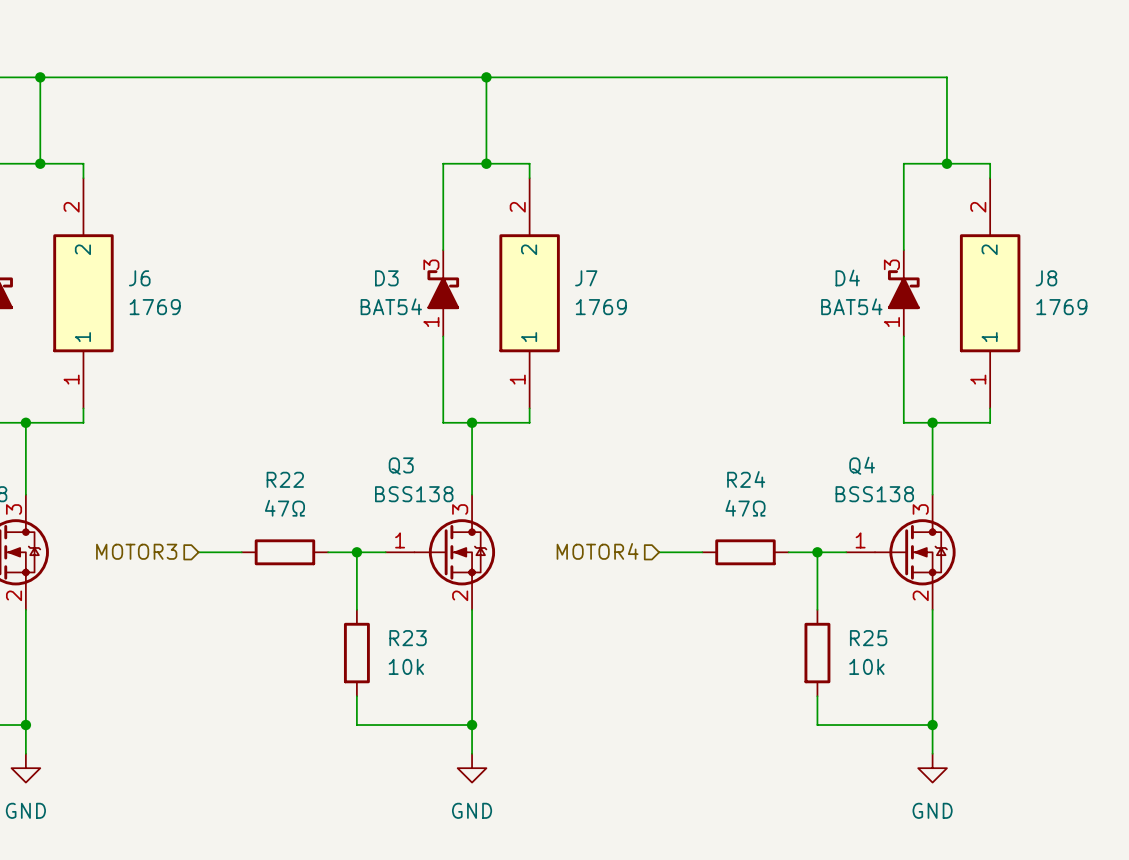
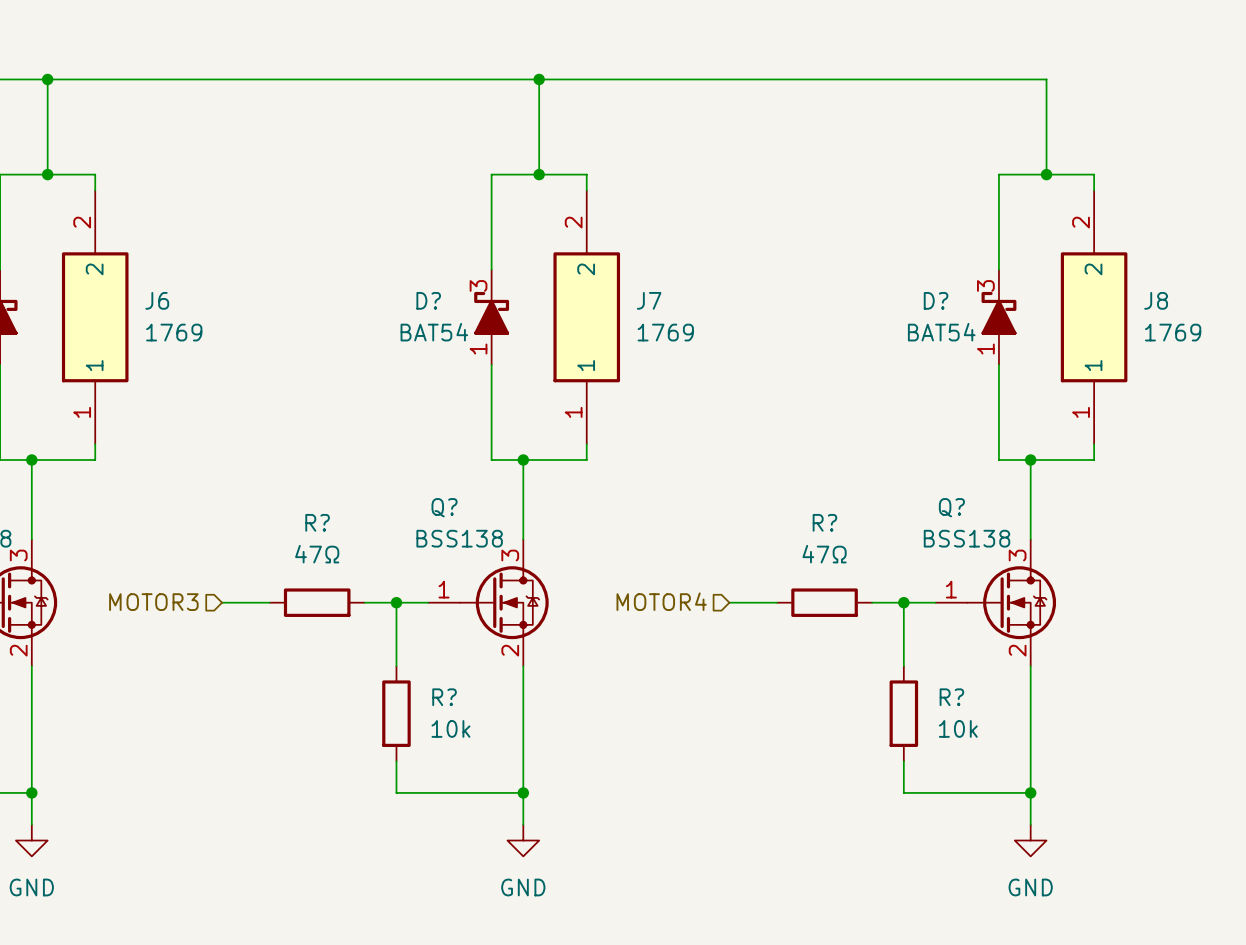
D4 name: D4 (847, 277) -> D? (936, 300)
D3 name: D3 (386, 278) -> D? (428, 300)
Q4 name: Q4 (862, 465) -> Q? (951, 507)
Q3 name: Q3 (401, 466) -> Q? (444, 507)
R22 name: R22 (285, 479) -> R? (317, 522)
R24 name: R24 (746, 479) -> R? (824, 522)
R23 name: R23 (408, 638) -> R? (444, 697)
R25 name: R25 (868, 638) -> R? (951, 697)

